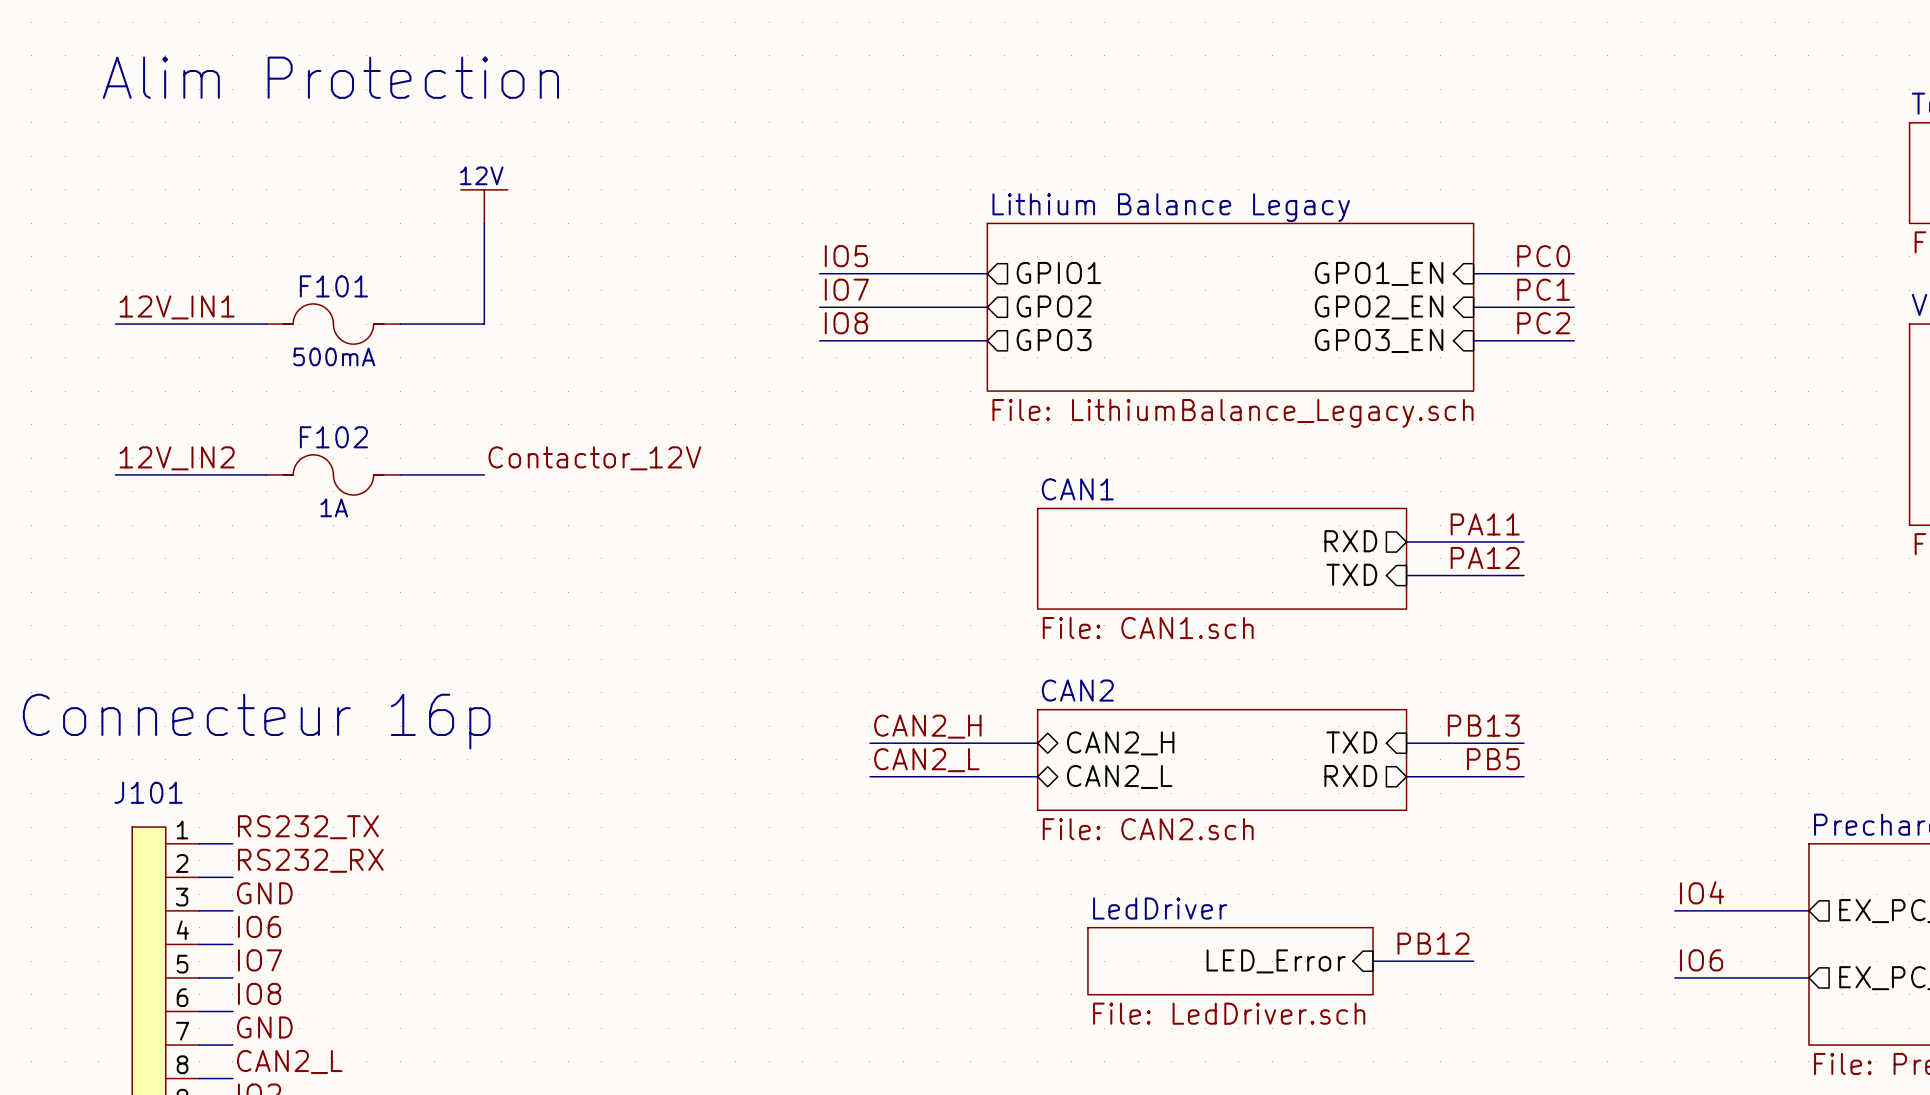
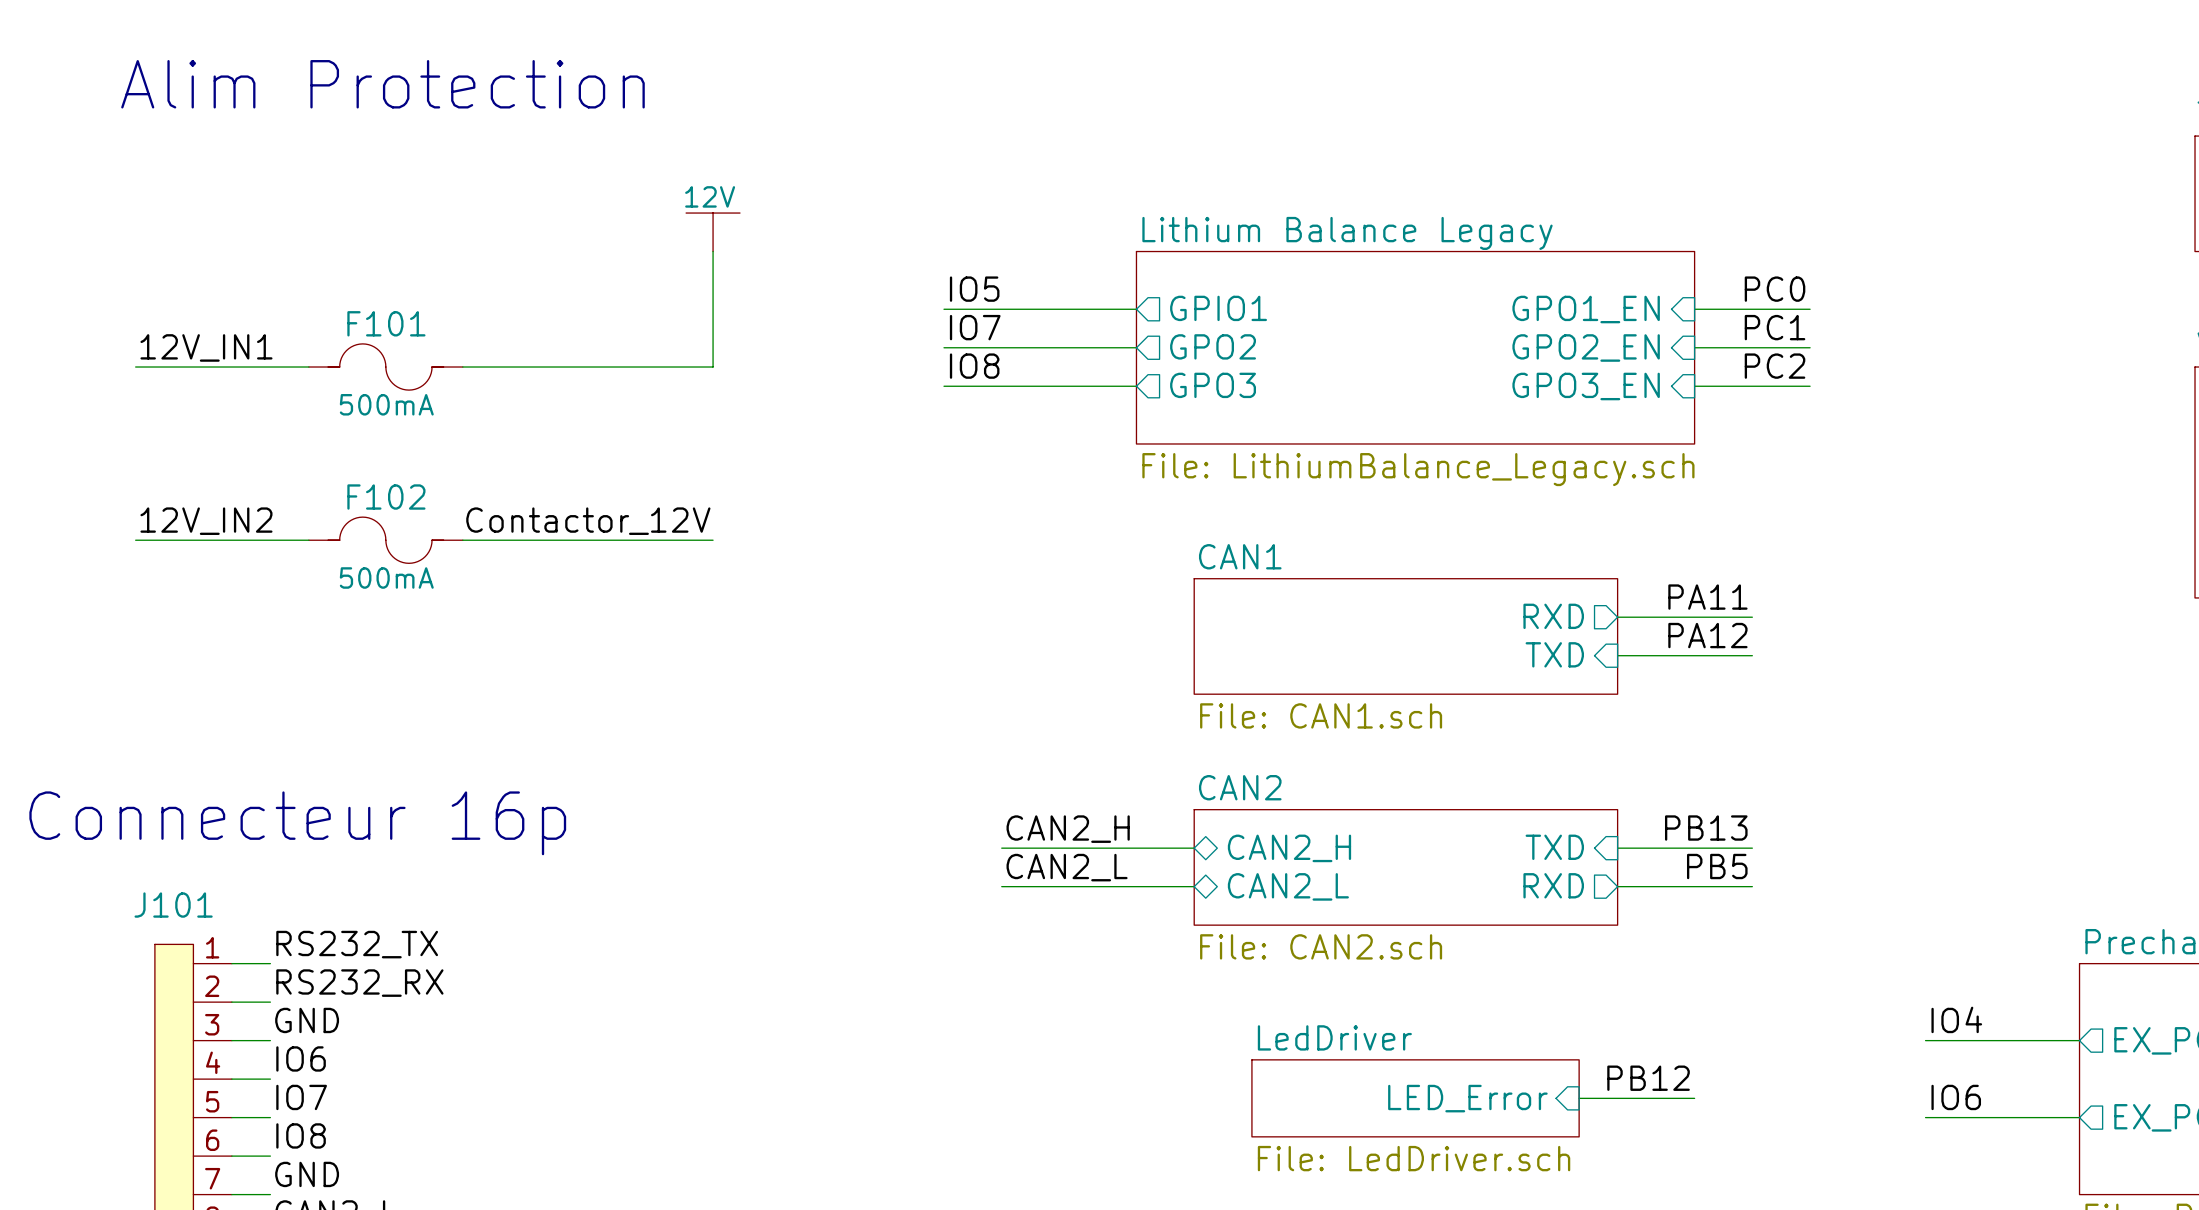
power symbol position: 12V (484, 206) -> 12V (713, 232)
wire: (484, 223) (484, 324) -> (713, 251) (713, 367) (559, 367)
label position: Contactor_12V (594, 458) -> Contactor_12V (588, 521)
wire: none -> (559, 540) (713, 540)
F102 text: 1A (334, 507) -> 500mA (386, 577)

